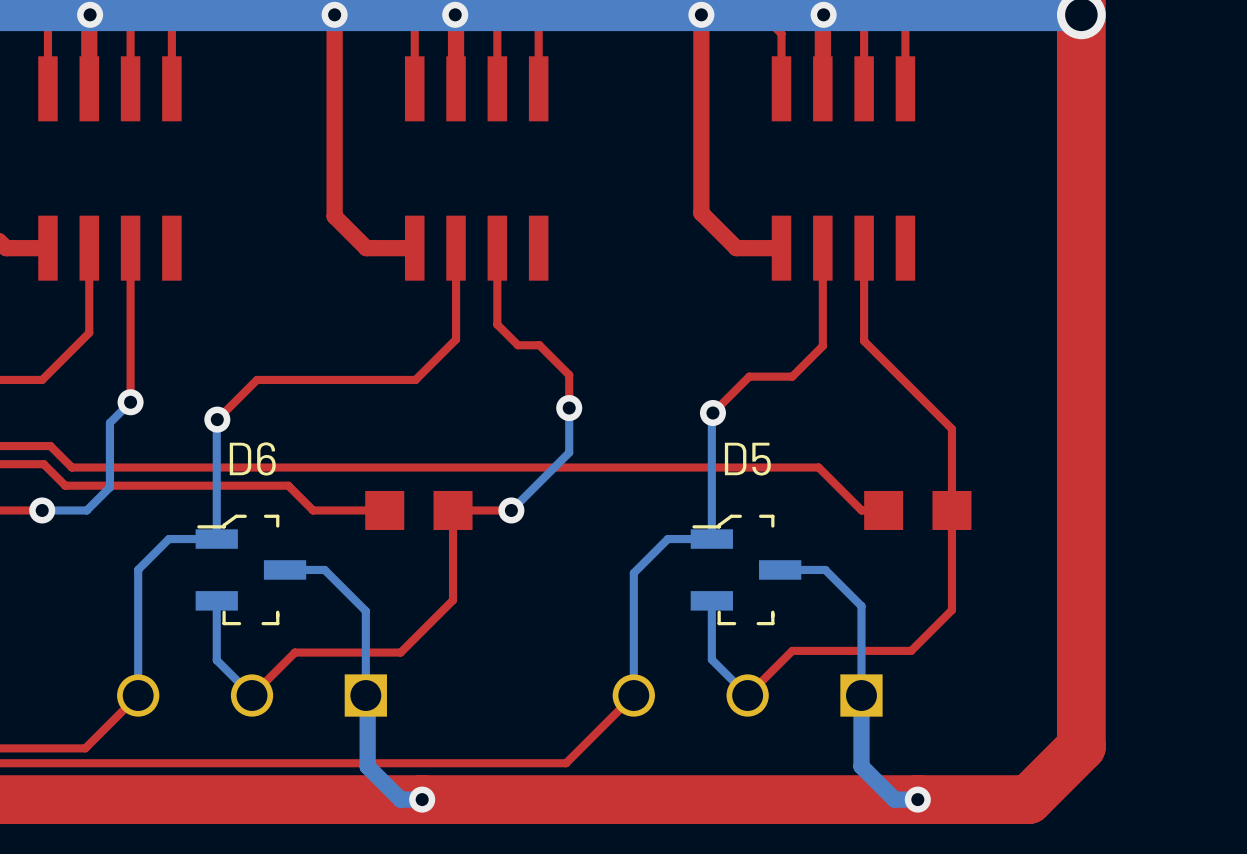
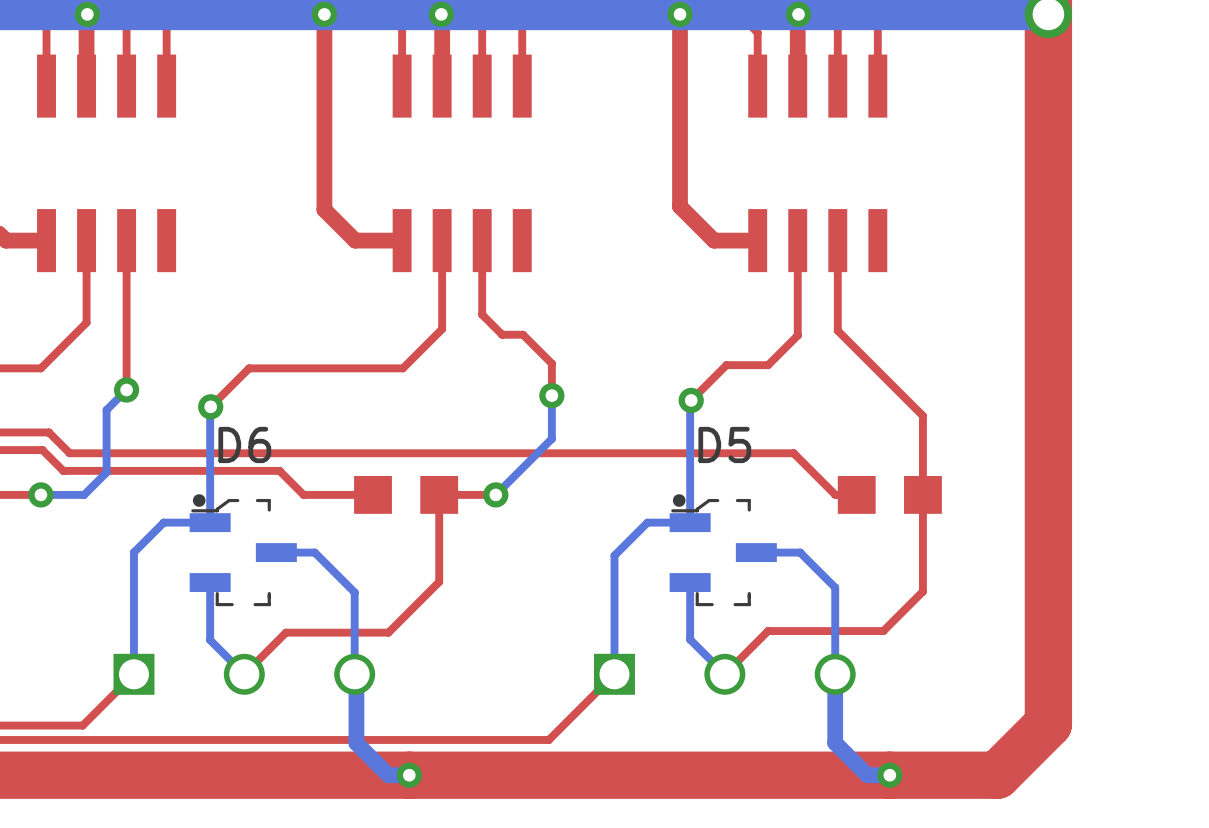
D6 footprint: [195, 514, 307, 626] -> [189, 494, 297, 607]
D5 footprint: [690, 514, 802, 626] -> [669, 494, 777, 607]
part rotation: 0° (252, 695) -> 180° (244, 674)
part rotation: 0° (747, 695) -> 180° (724, 674)

